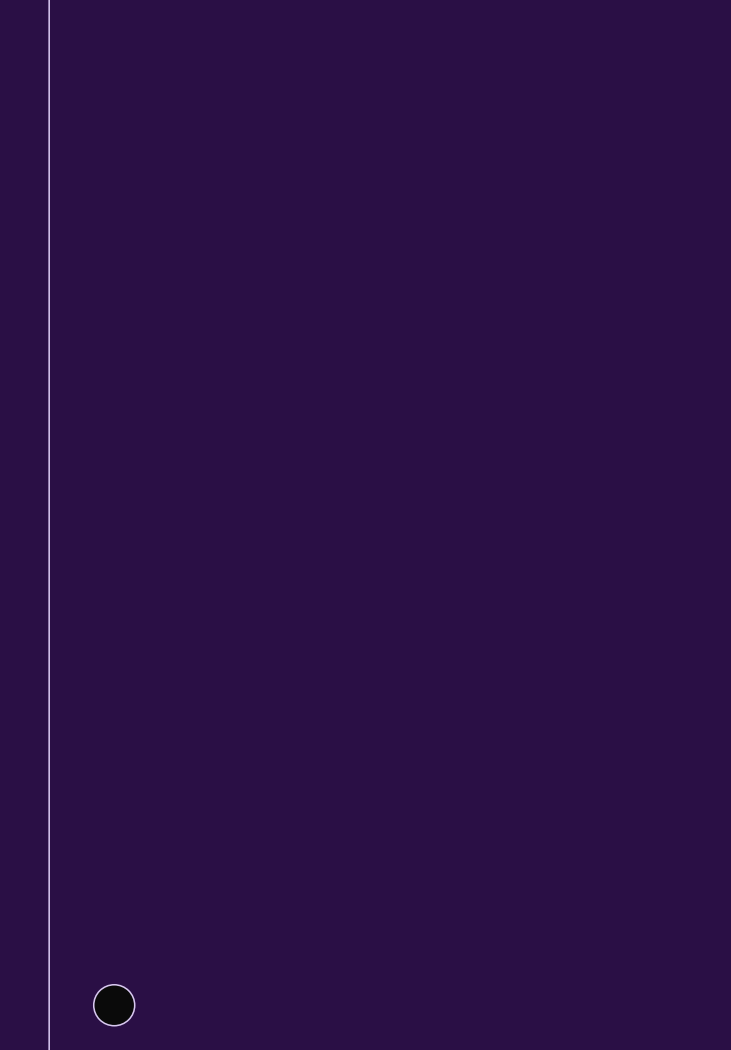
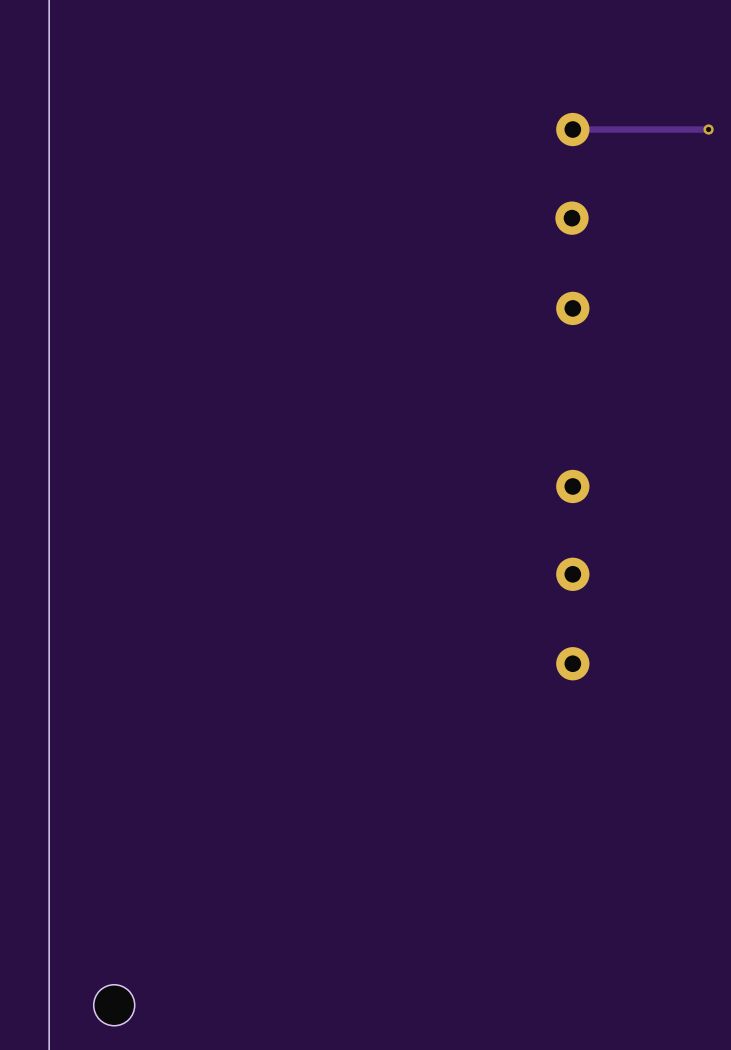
part: none -> (572, 129)
track: none -> (708, 129) (572, 129)
via: none -> (708, 129)
part: none -> (572, 218)
part: none -> (572, 308)
part: none -> (572, 486)
part: none -> (572, 574)
part: none -> (572, 663)

